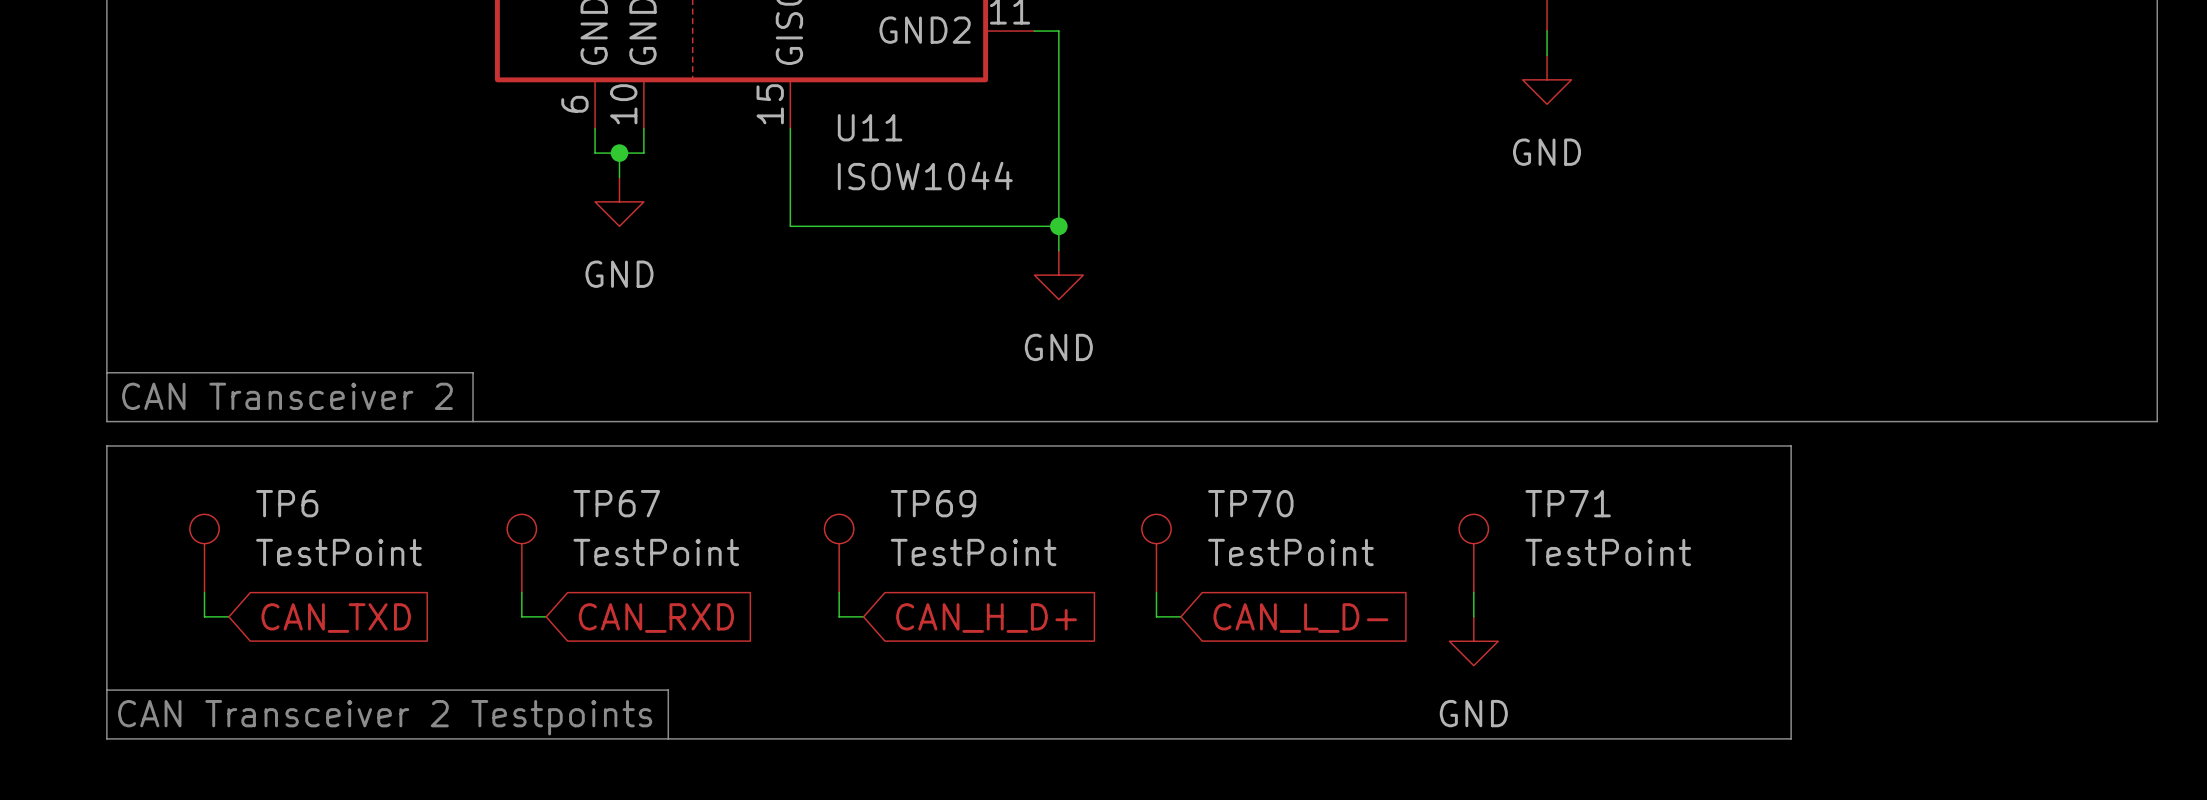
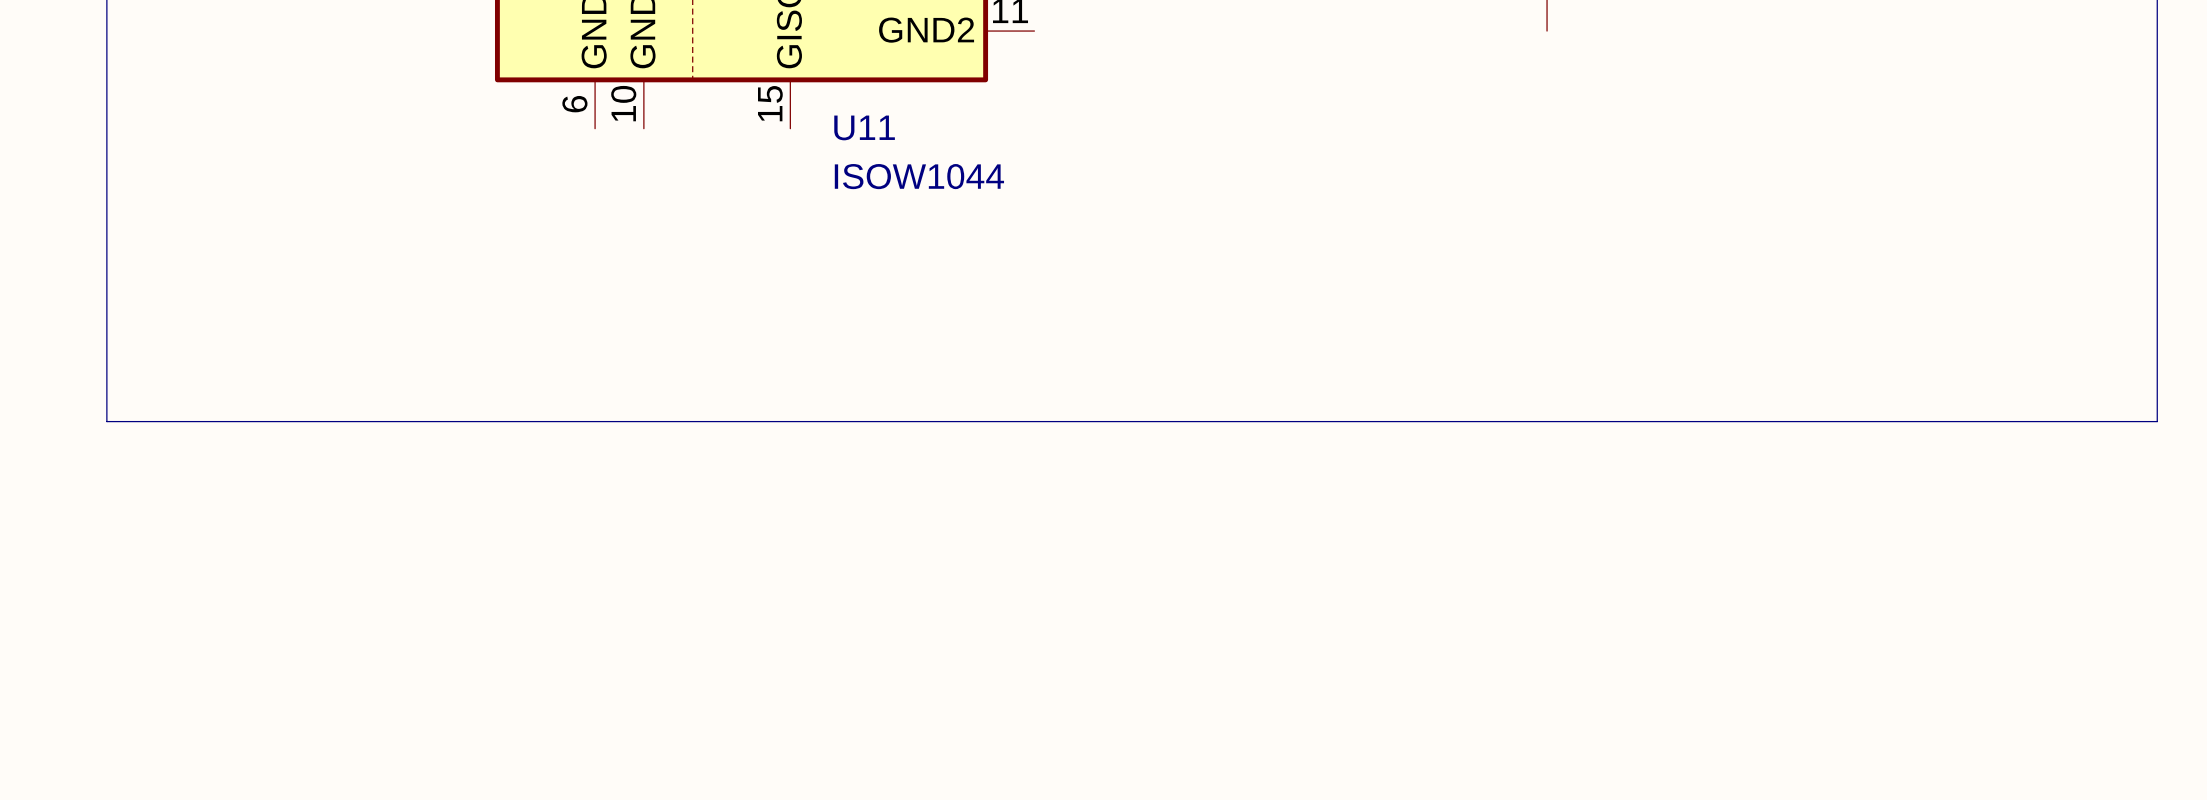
wire: (1034, 31) (1058, 31) (1058, 250) -> none
wire: (1547, 31) (1547, 55) -> none
power symbol: GND (1547, 79) -> none
wire: (595, 128) (595, 153) (643, 153) (643, 128) -> none
wire: (790, 128) (790, 226) (1058, 226) -> none
wire: (619, 153) (619, 177) -> none
junction: (619, 153) -> none
power symbol: GND (619, 201) -> none
junction: (1058, 226) -> none
power symbol: GND (1058, 275) -> none
line: (106, 372) (473, 372) (473, 421) -> none
text: CAN Transceiver 2 (287, 396) -> none
line: (106, 445) (106, 738) (1791, 738) (1791, 445) (106, 445) -> none
TP6: TestPoint (204, 553) -> none
TP67: TestPoint (521, 553) -> none
TP69: TestPoint (839, 553) -> none
TP70: TestPoint (1156, 553) -> none
TP71: TestPoint (1473, 553) -> none
wire: (204, 592) (204, 616) (228, 616) -> none
wire: (521, 592) (521, 616) (546, 616) -> none
wire: (839, 592) (839, 616) (863, 616) -> none
wire: (1156, 592) (1156, 616) (1180, 616) -> none
wire: (1473, 592) (1473, 616) -> none
global label: CAN_TXD (336, 618) -> none
global label: CAN_RXD (656, 618) -> none
global label: CAN_H_D+ (986, 618) -> none
global label: CAN_L_D- (1300, 618) -> none
power symbol: GND (1473, 641) -> none
line: (106, 690) (668, 690) (668, 738) -> none
text: CAN Transceiver 2 Testpoints (385, 717) -> none

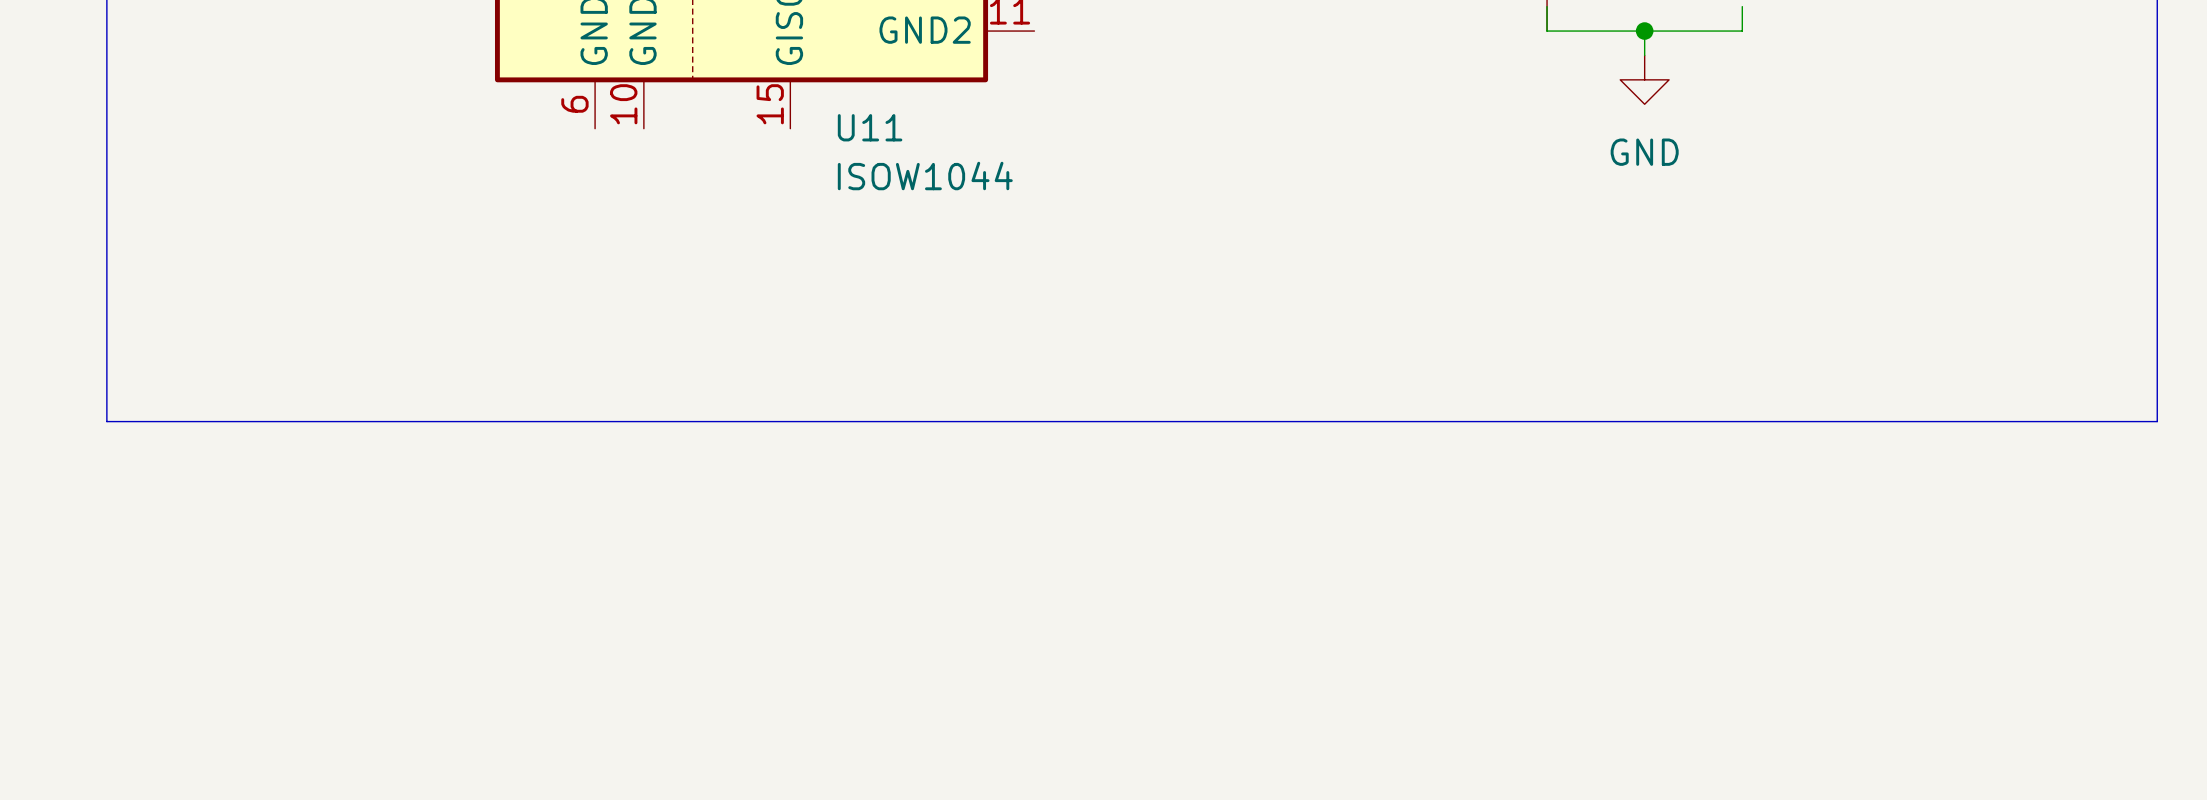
wire: none -> (1547, 6) (1547, 31) (1742, 31) (1742, 6)
wire: none -> (1644, 31) (1644, 55)
junction: none -> (1644, 31)
power symbol: none -> GND (1644, 79)

